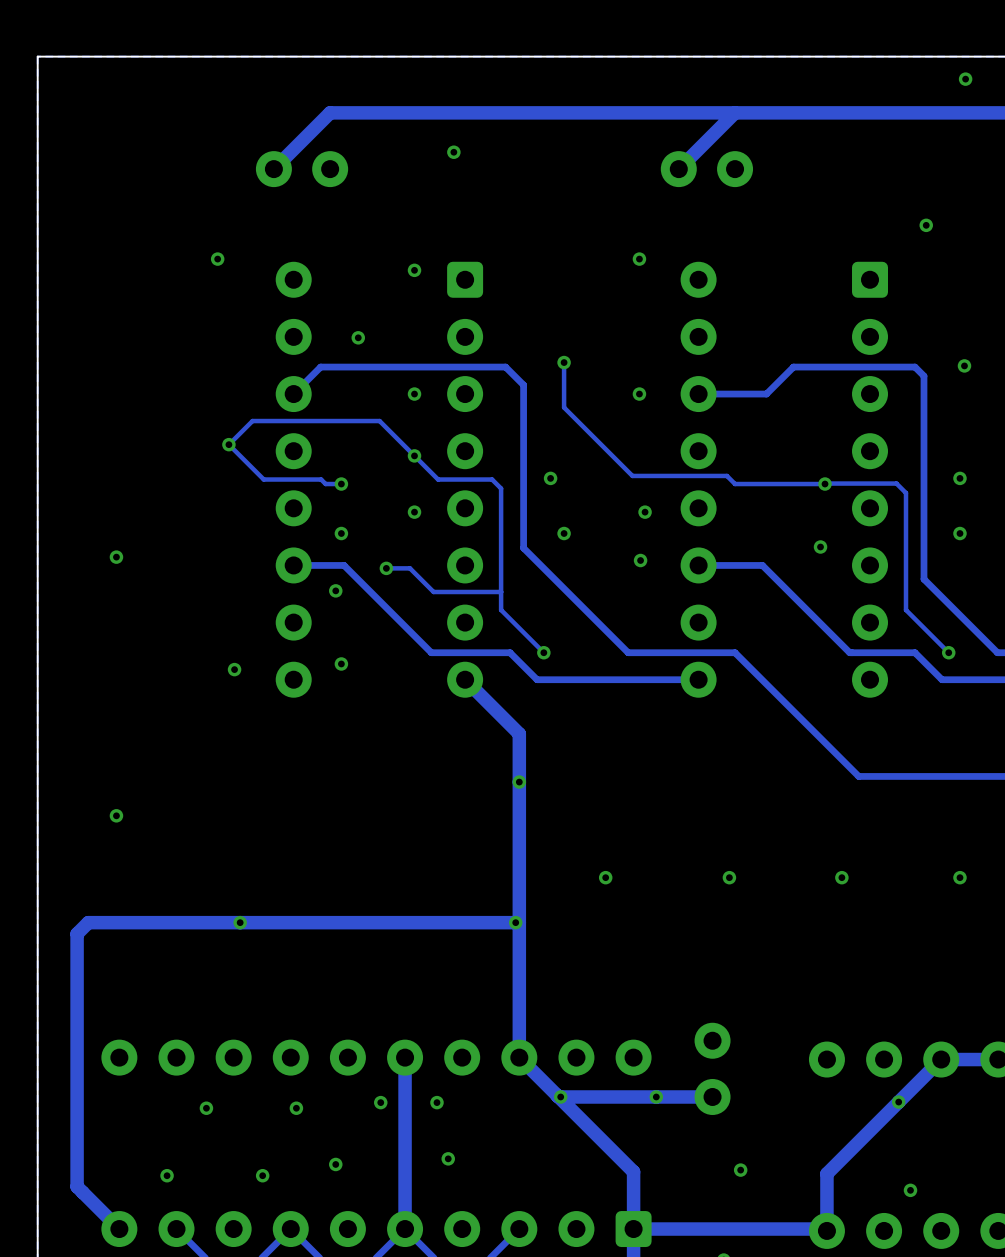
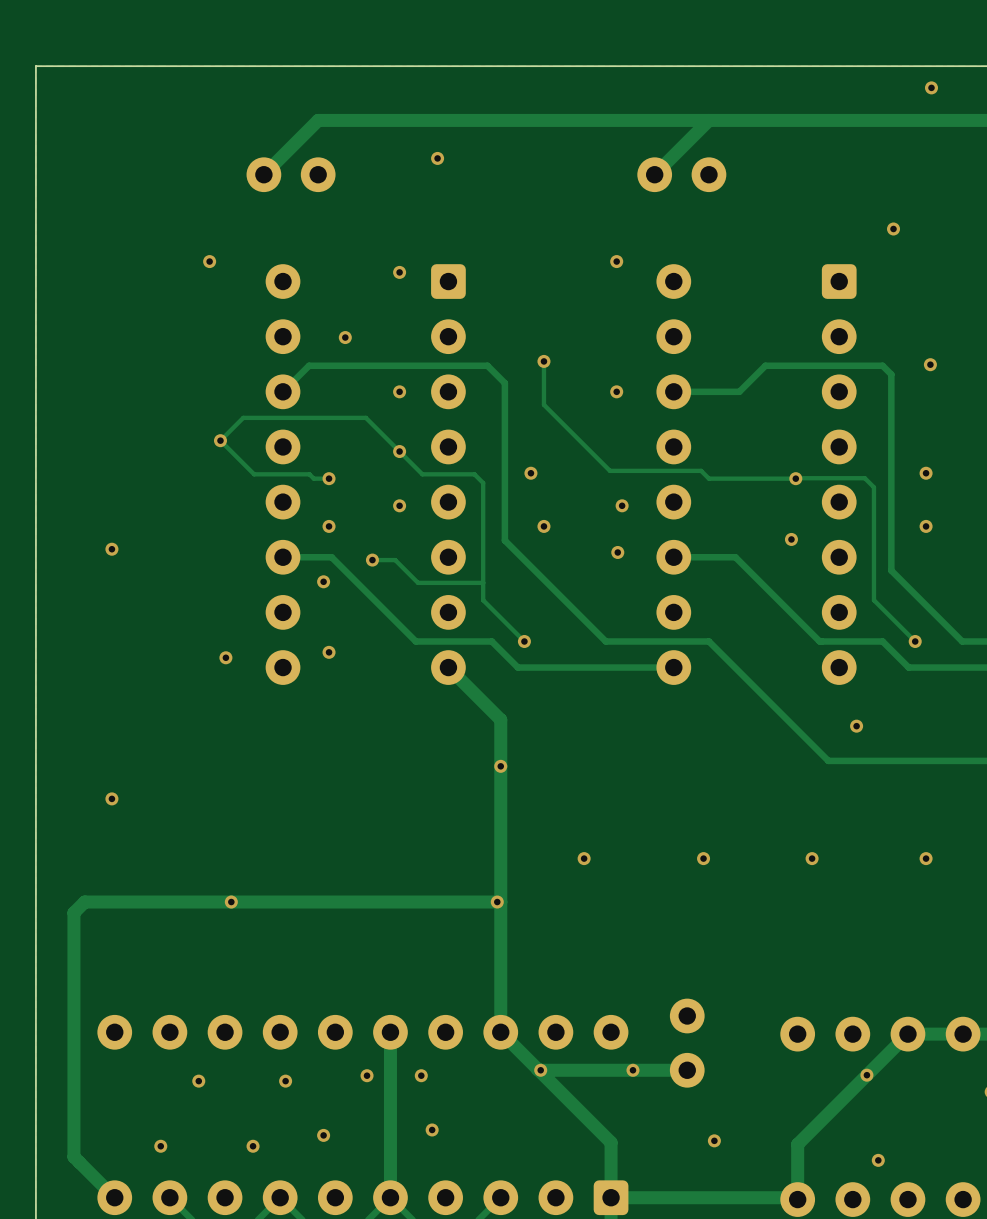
via: none -> (856, 726)

